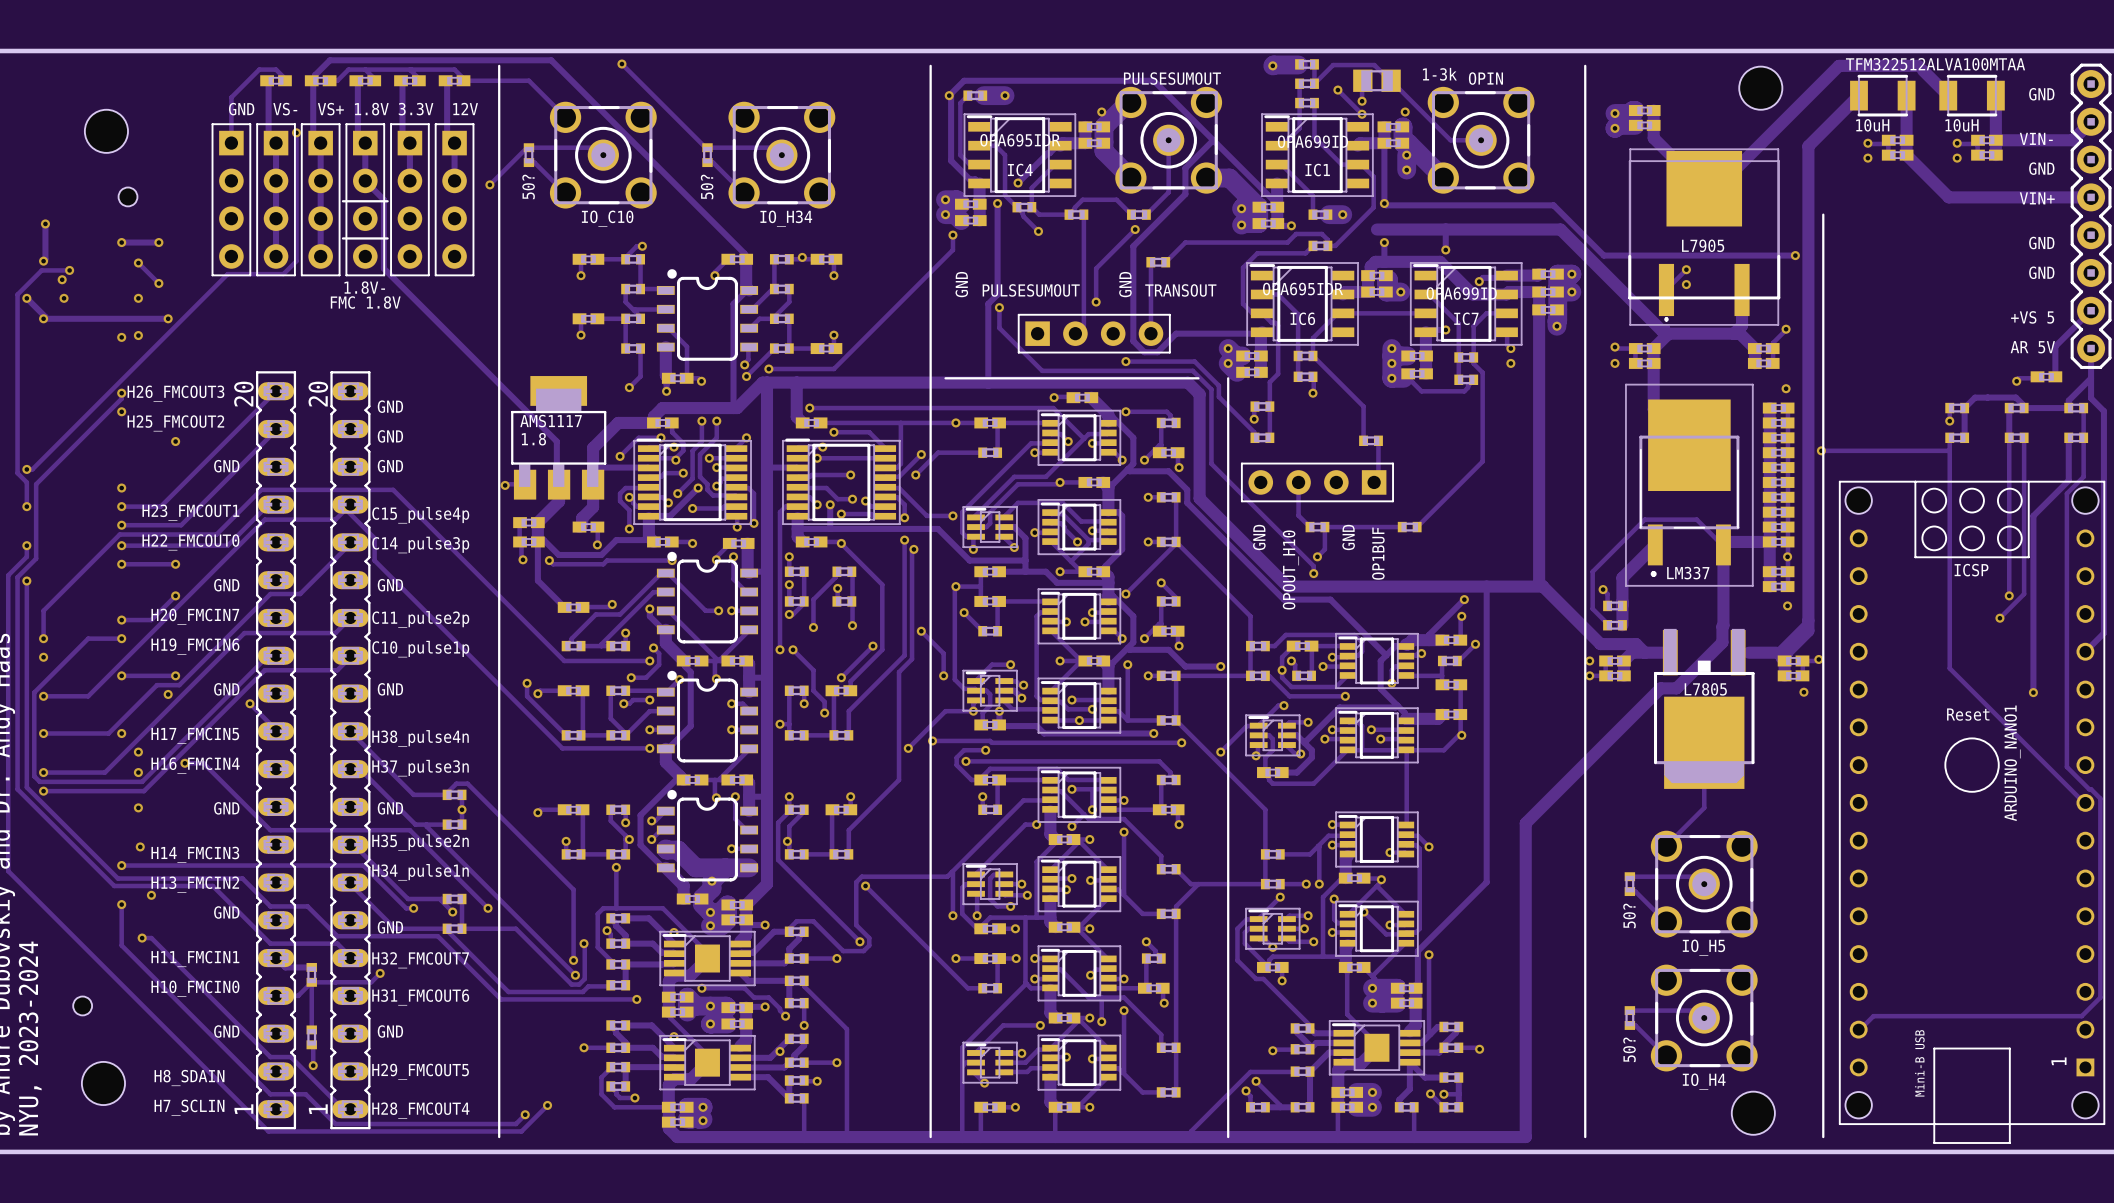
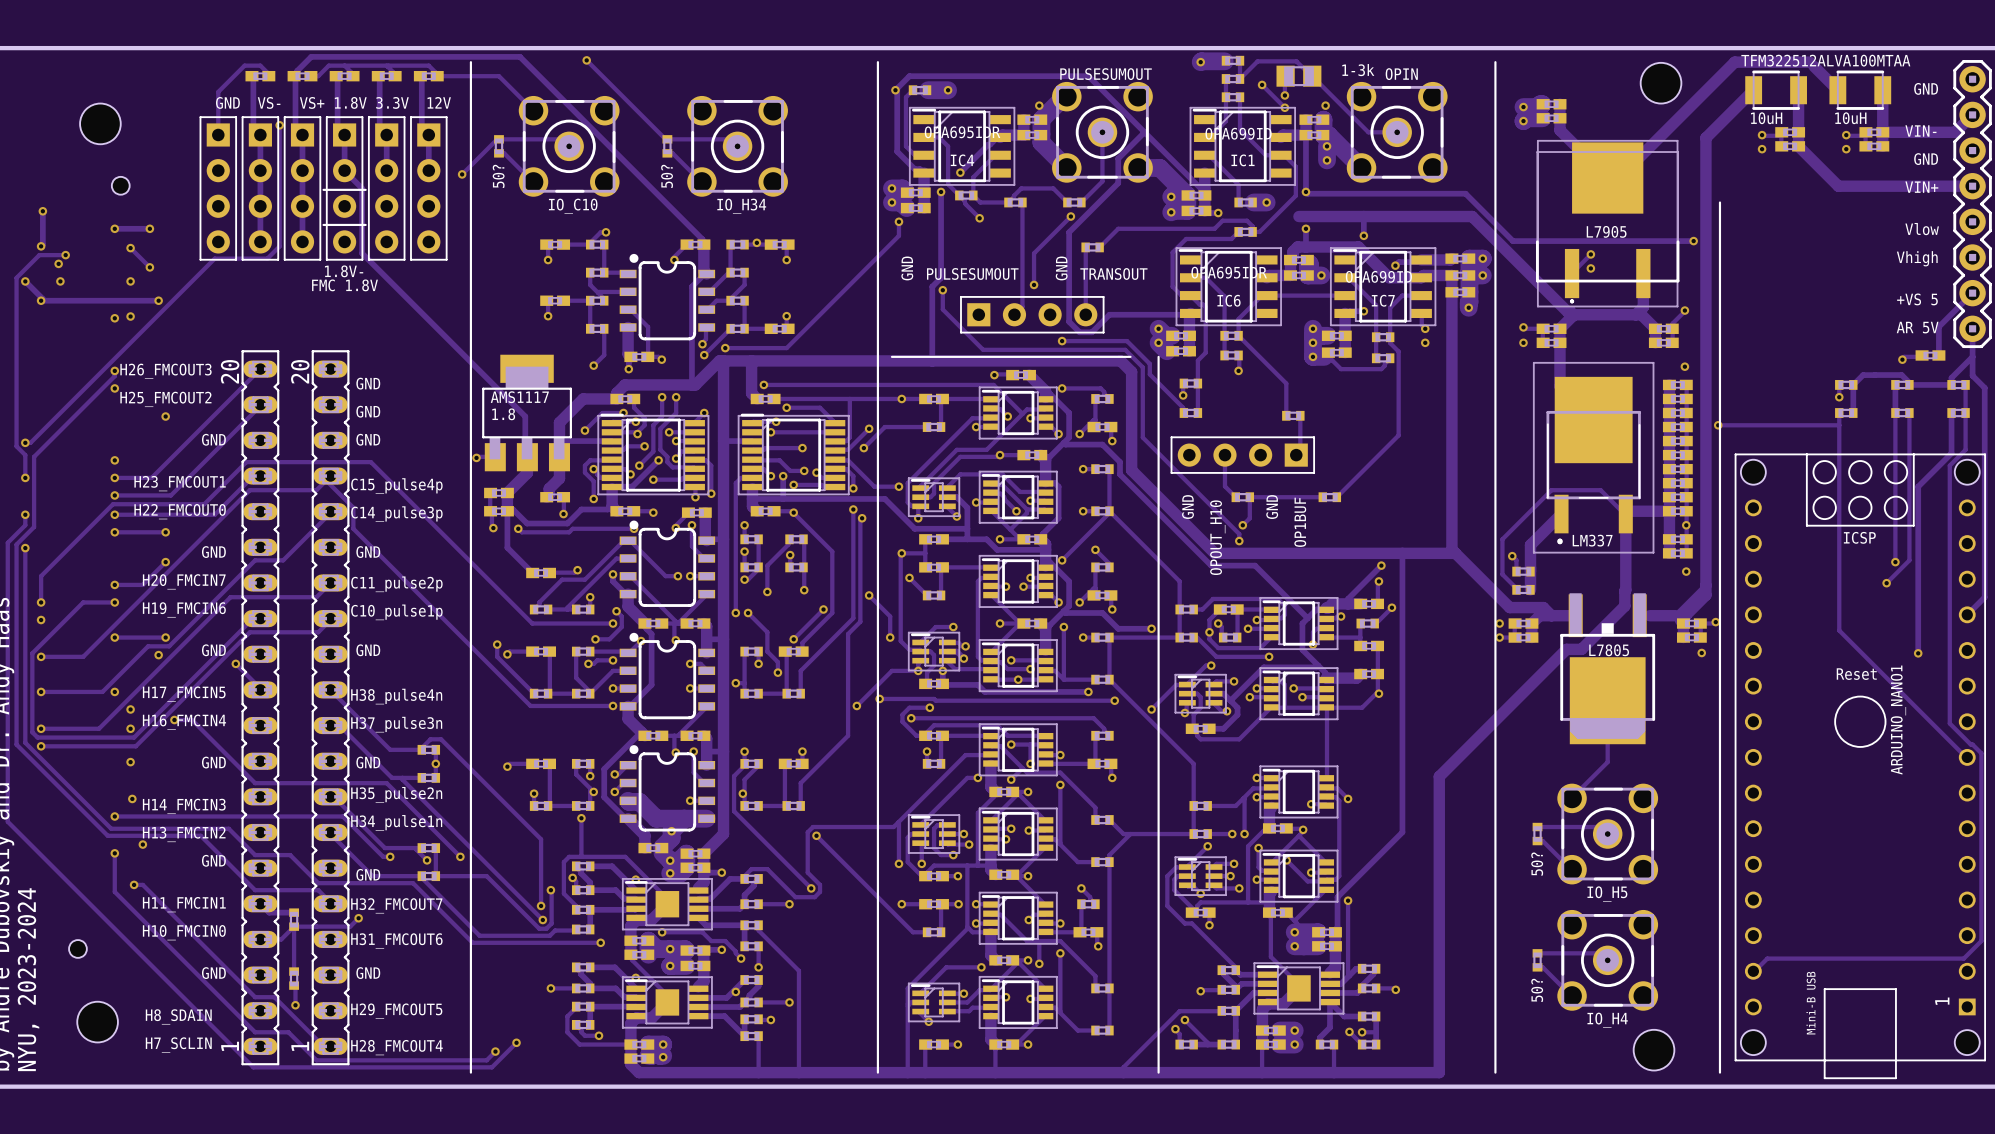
text: GND (2041, 243) -> Vlow (1922, 229)
text: GND (2041, 272) -> Vhigh (1917, 258)

